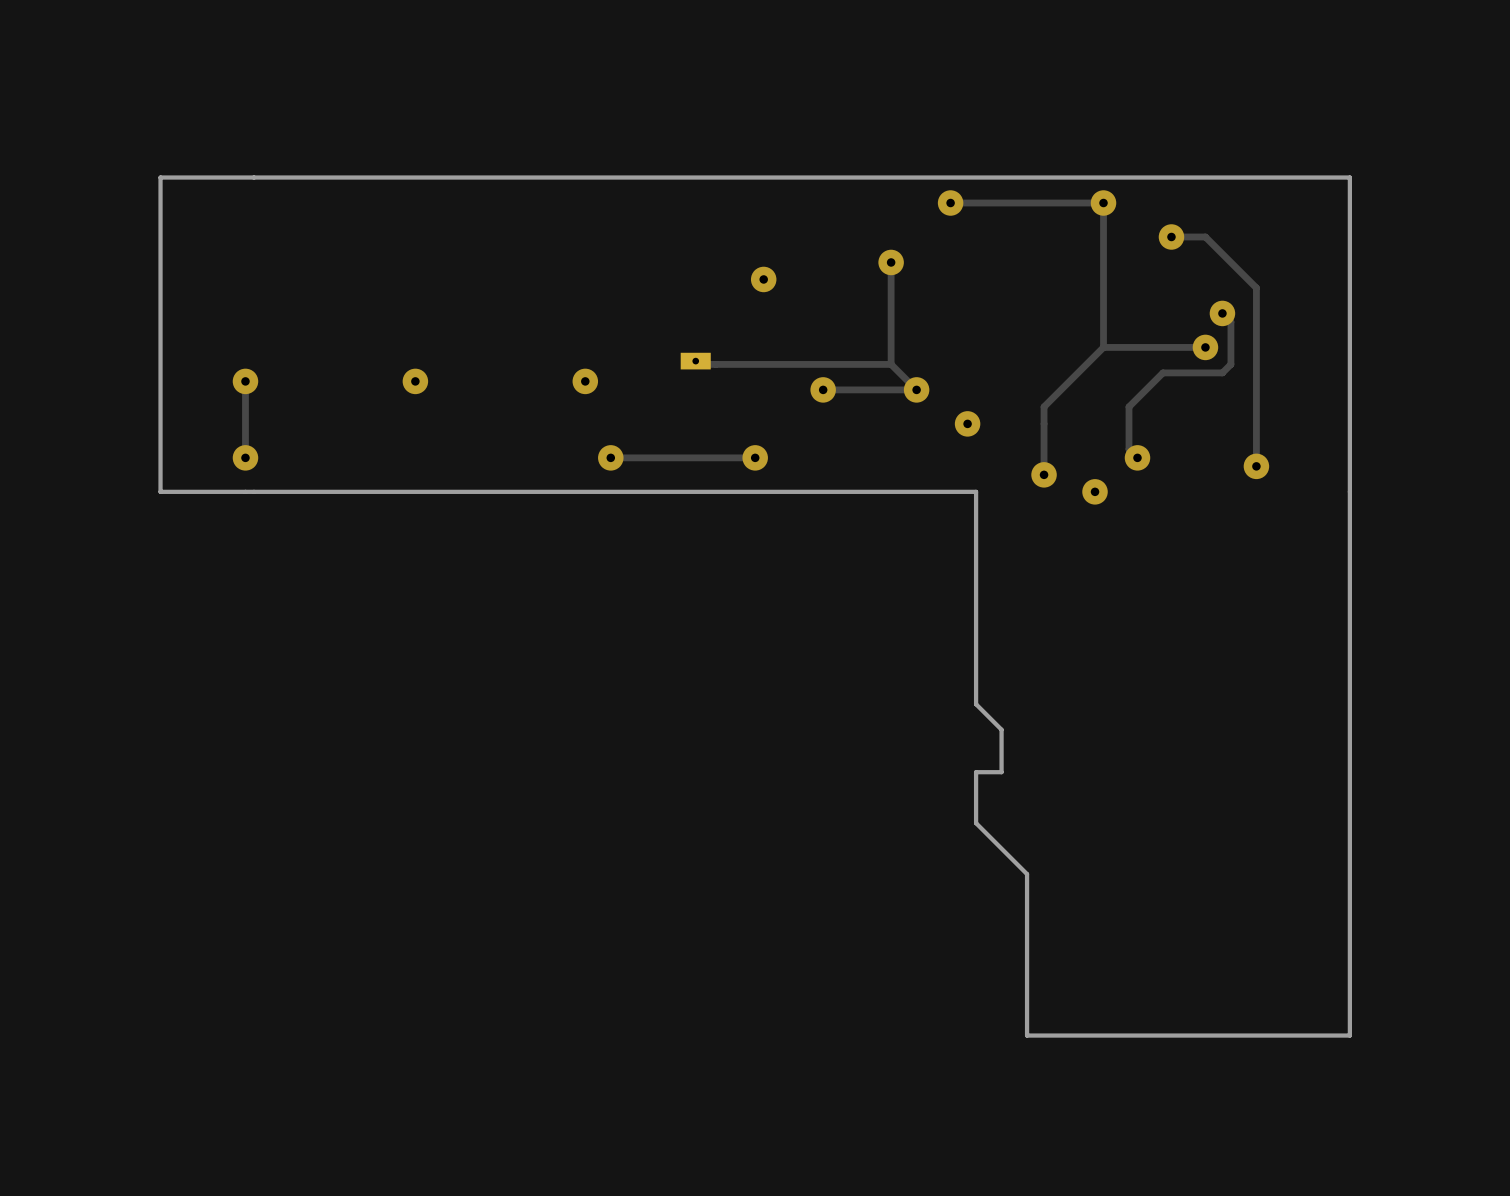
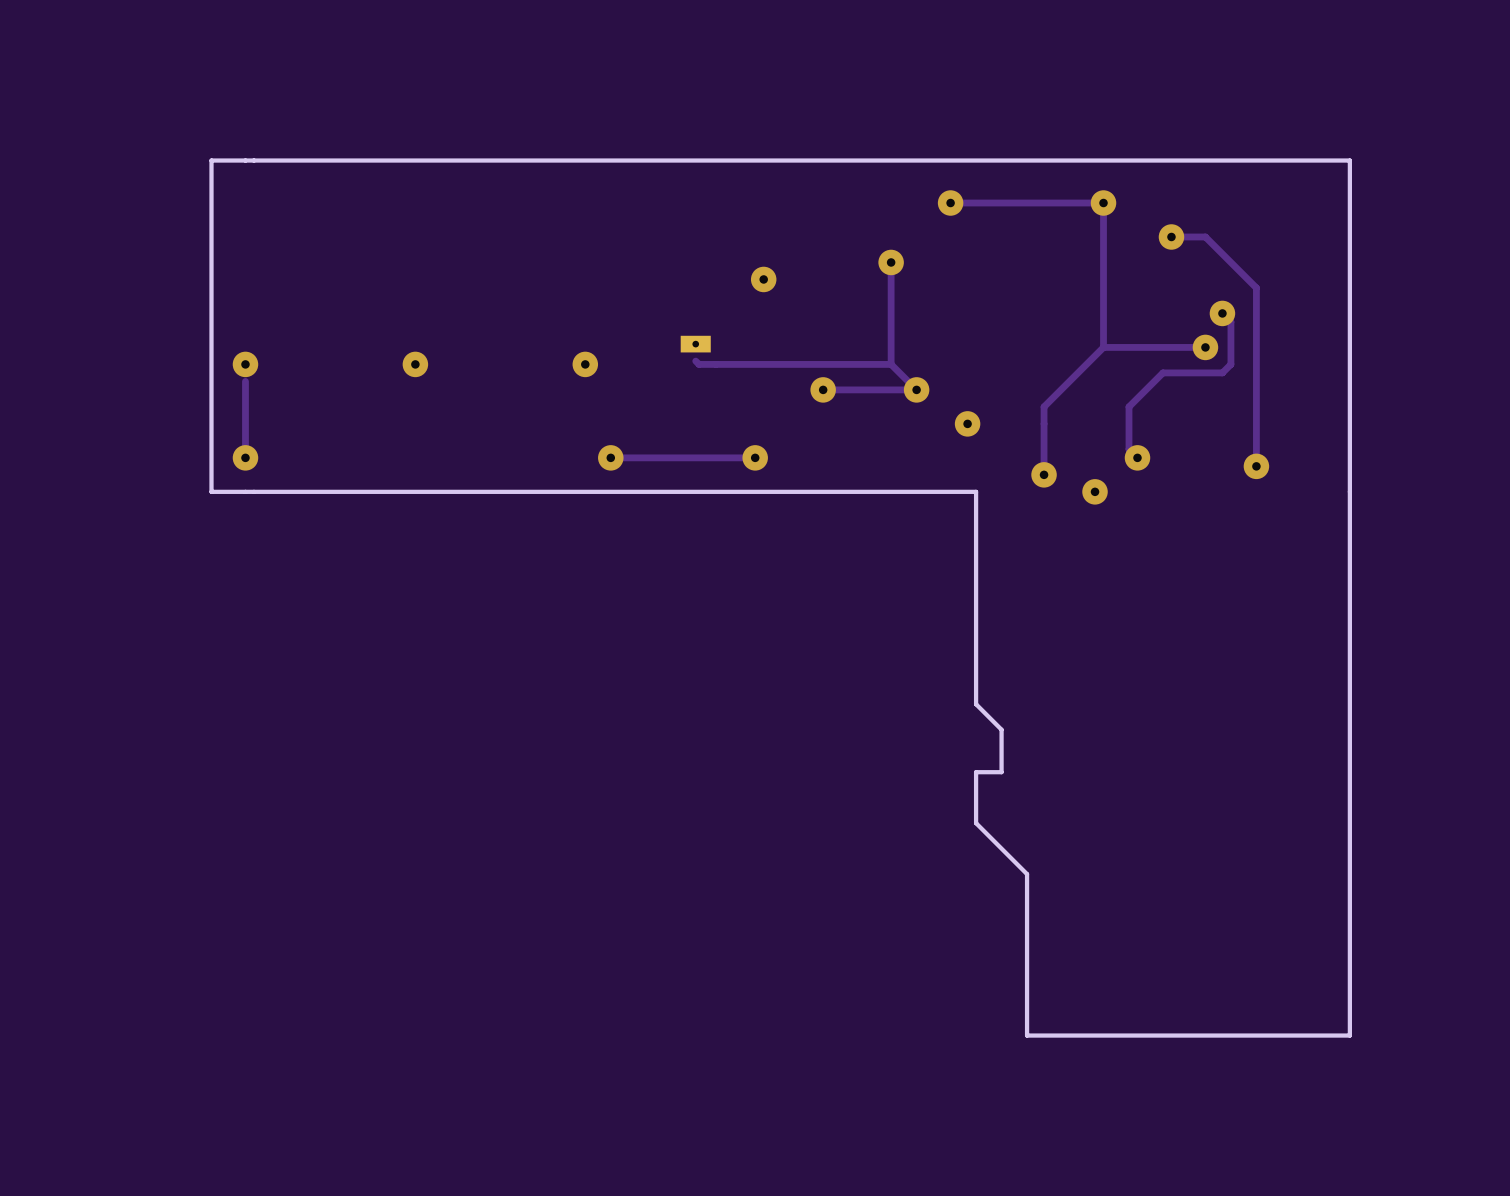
board edge: (1349, 177) (160, 177) (160, 491) (211, 491) -> (1349, 177) (1349, 160) (211, 160) (211, 491)
part position: (695, 361) -> (695, 344)
via position: (245, 381) -> (245, 364)
via position: (415, 381) -> (415, 364)
via position: (585, 381) -> (585, 364)

